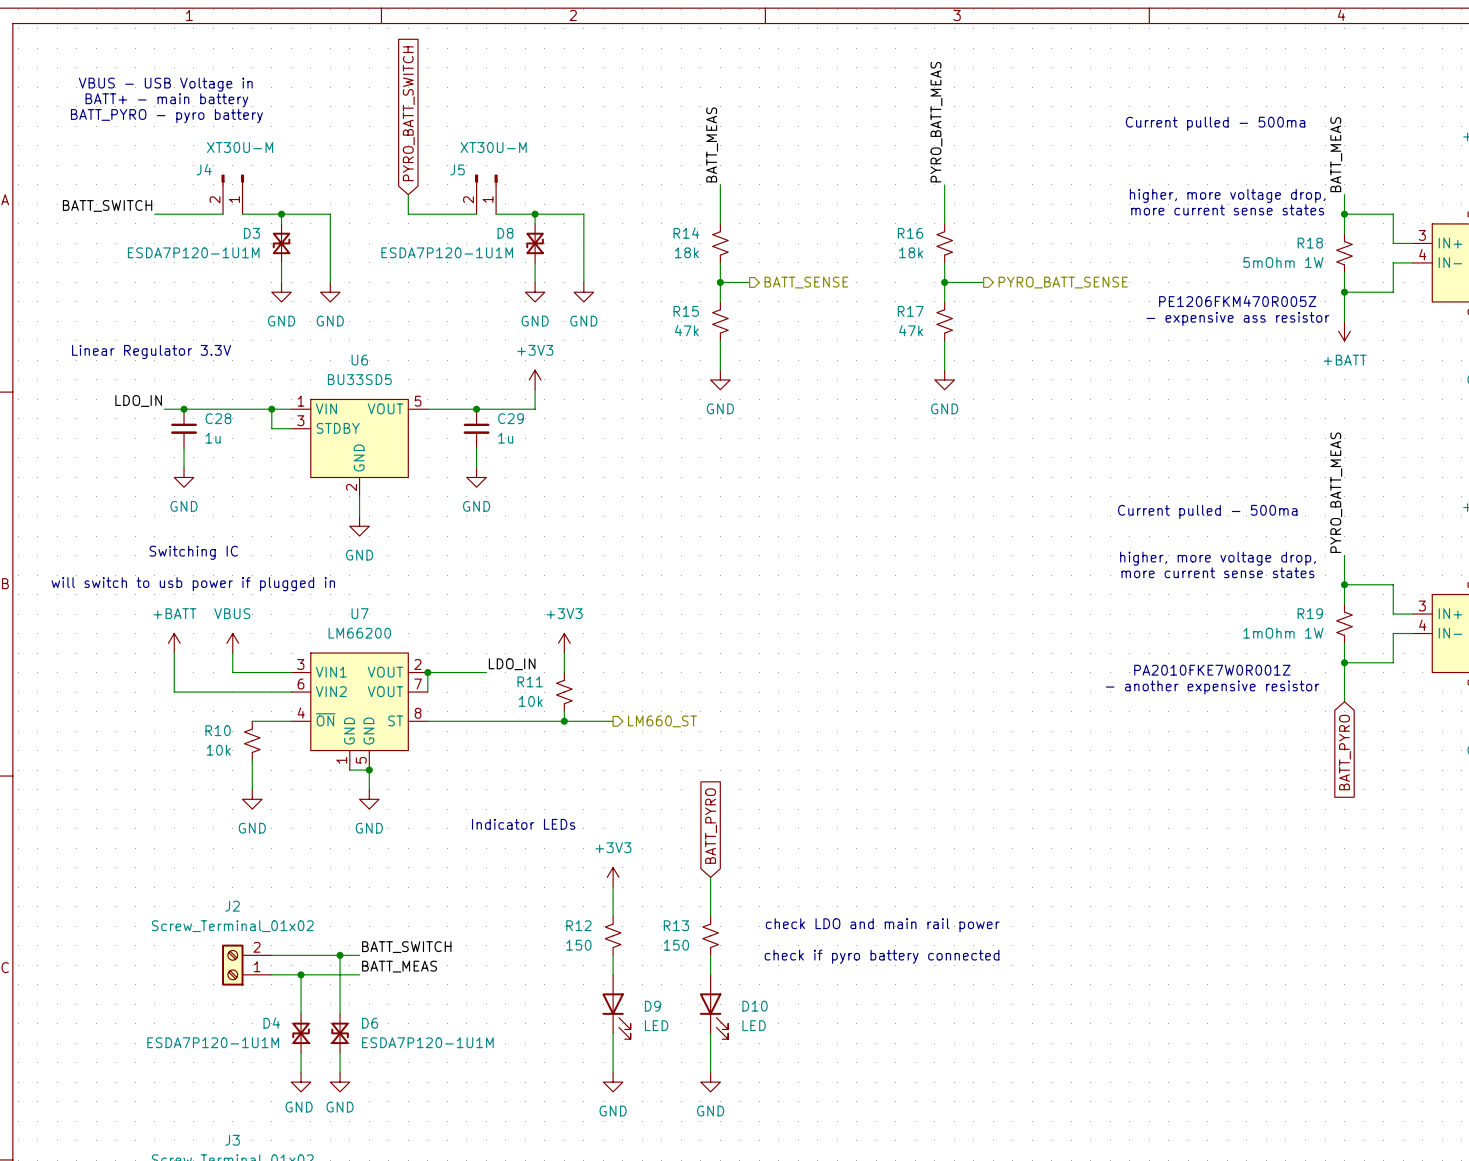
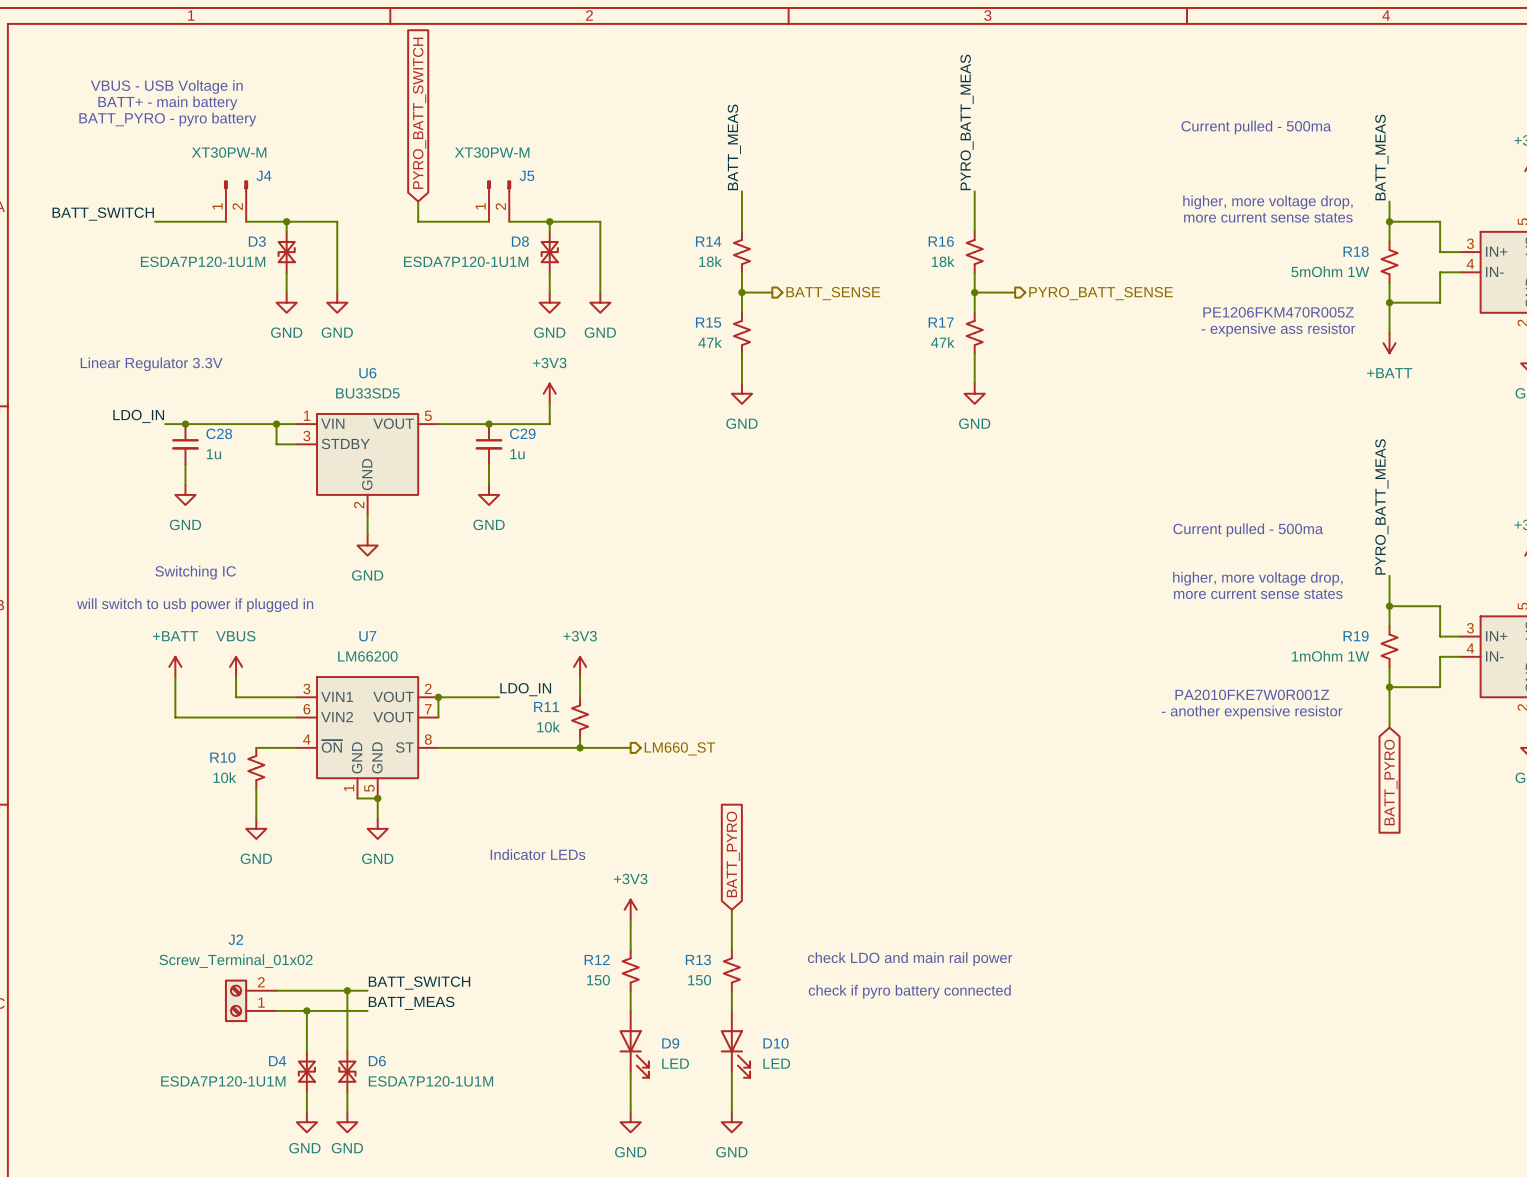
J4 value: XT30U-M (240, 147) -> XT30PW-M (229, 152)
J5 value: XT30U-M (493, 147) -> XT30PW-M (492, 152)
J4 flip: as is (232, 180) -> left-right (236, 186)
J5 flip: as is (486, 180) -> left-right (499, 186)

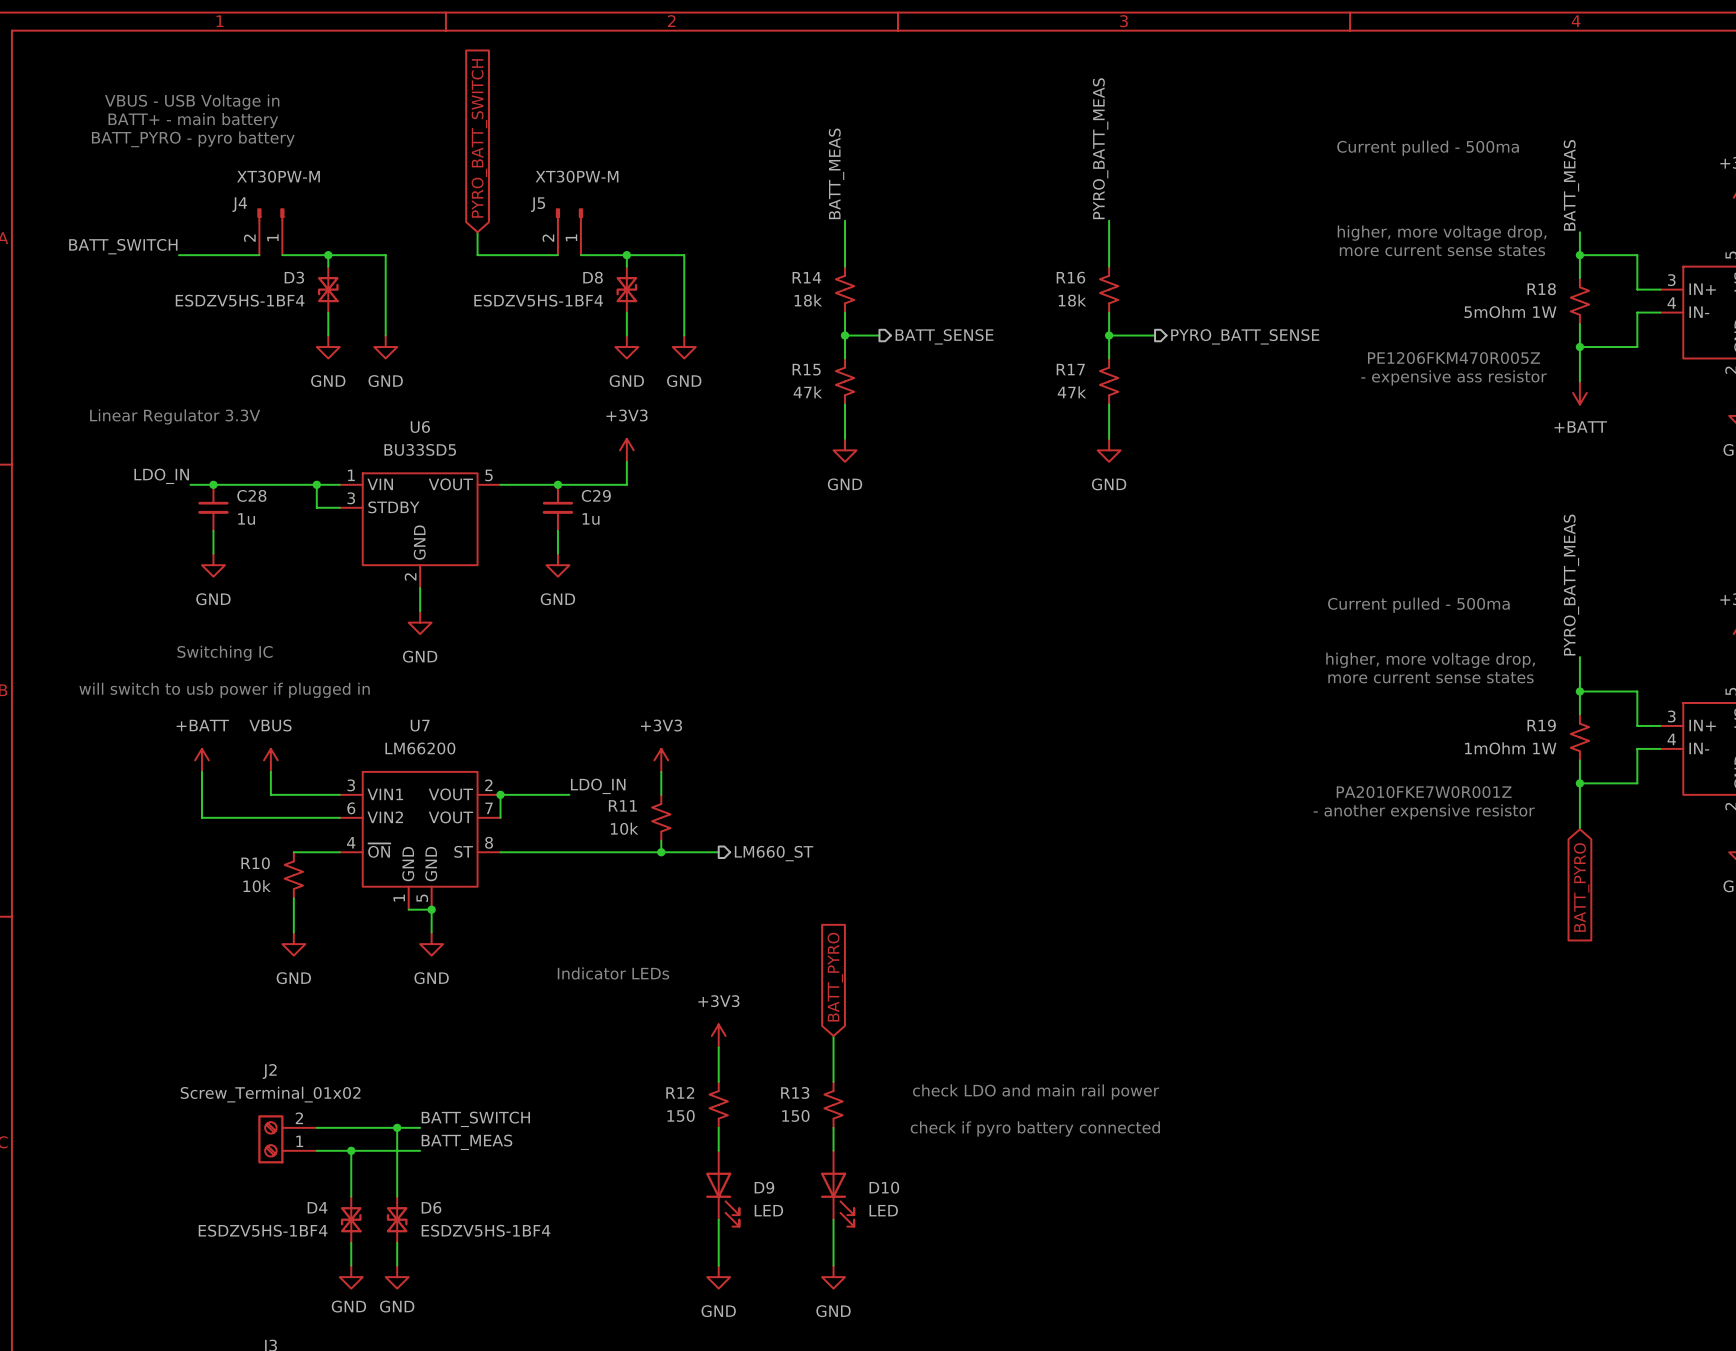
J4 flip: as is (236, 186) -> left-right (270, 214)
J5 flip: as is (499, 186) -> left-right (569, 214)
D3 value: ESDA7P120-1U1M (203, 261) -> ESDZV5HS-1BF4 (240, 300)
D8 value: ESDA7P120-1U1M (466, 261) -> ESDZV5HS-1BF4 (538, 300)
D4 value: ESDA7P120-1U1M (223, 1081) -> ESDZV5HS-1BF4 (263, 1230)
D6 value: ESDA7P120-1U1M (430, 1081) -> ESDZV5HS-1BF4 (486, 1230)

